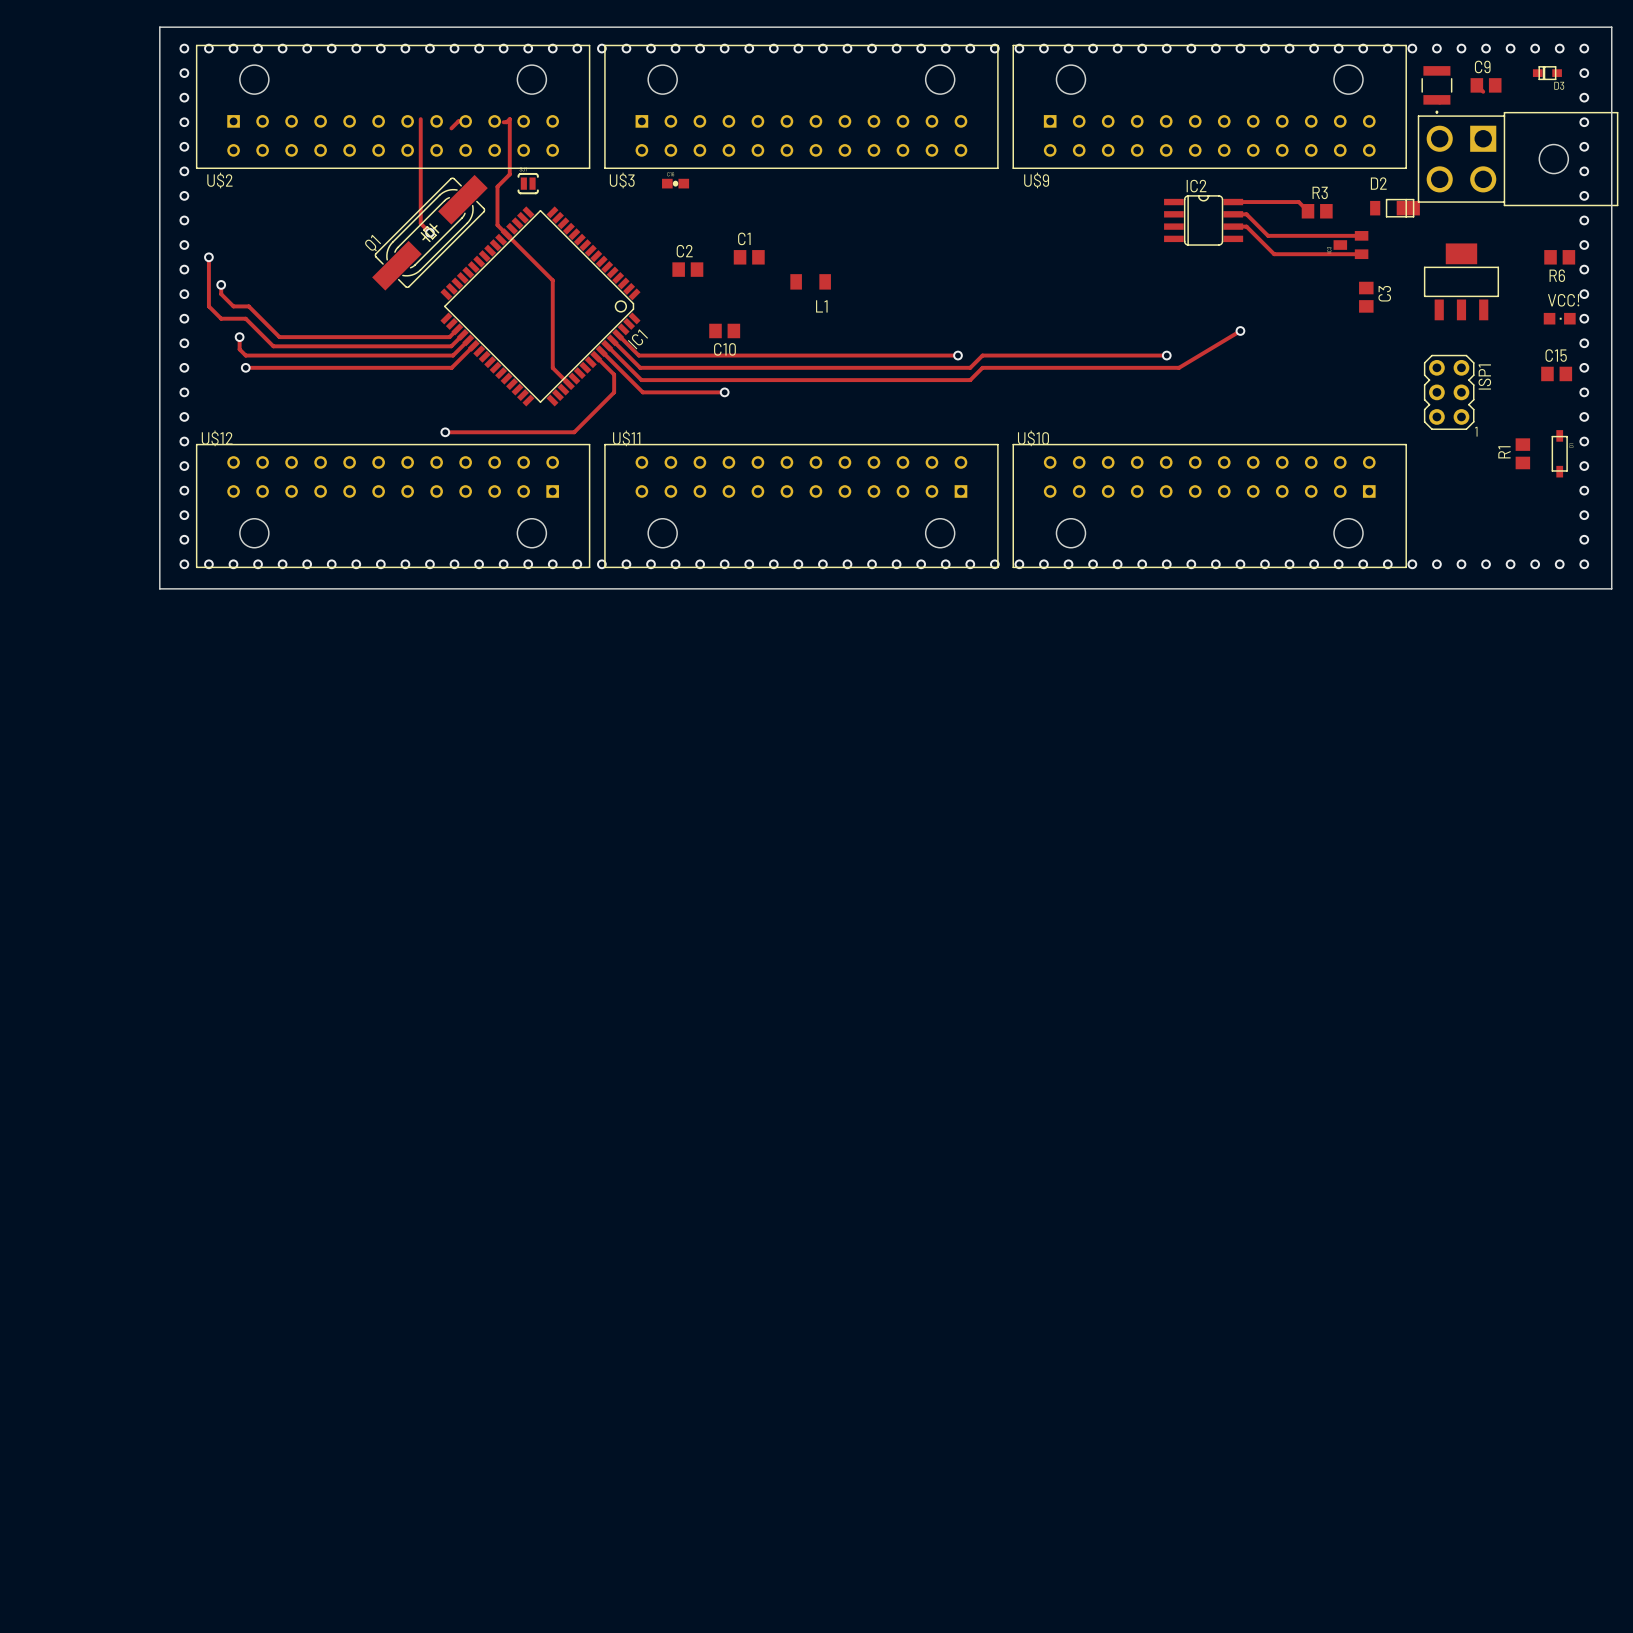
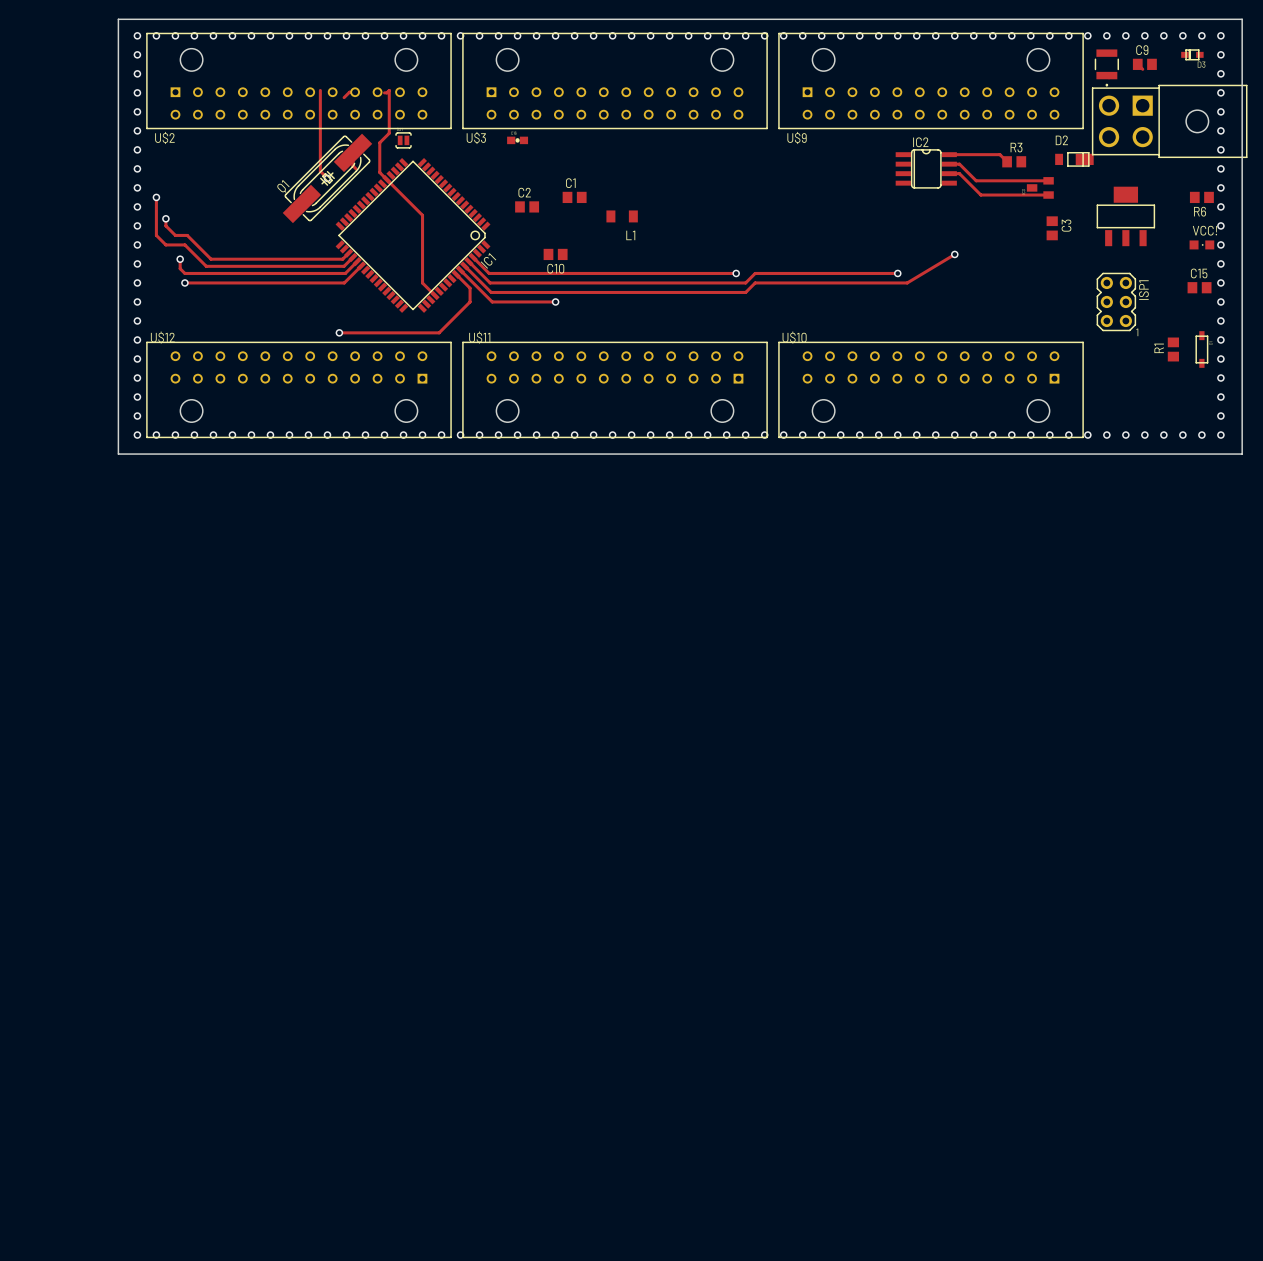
track: none -> (353, 152) (353, 165) (356, 168)

